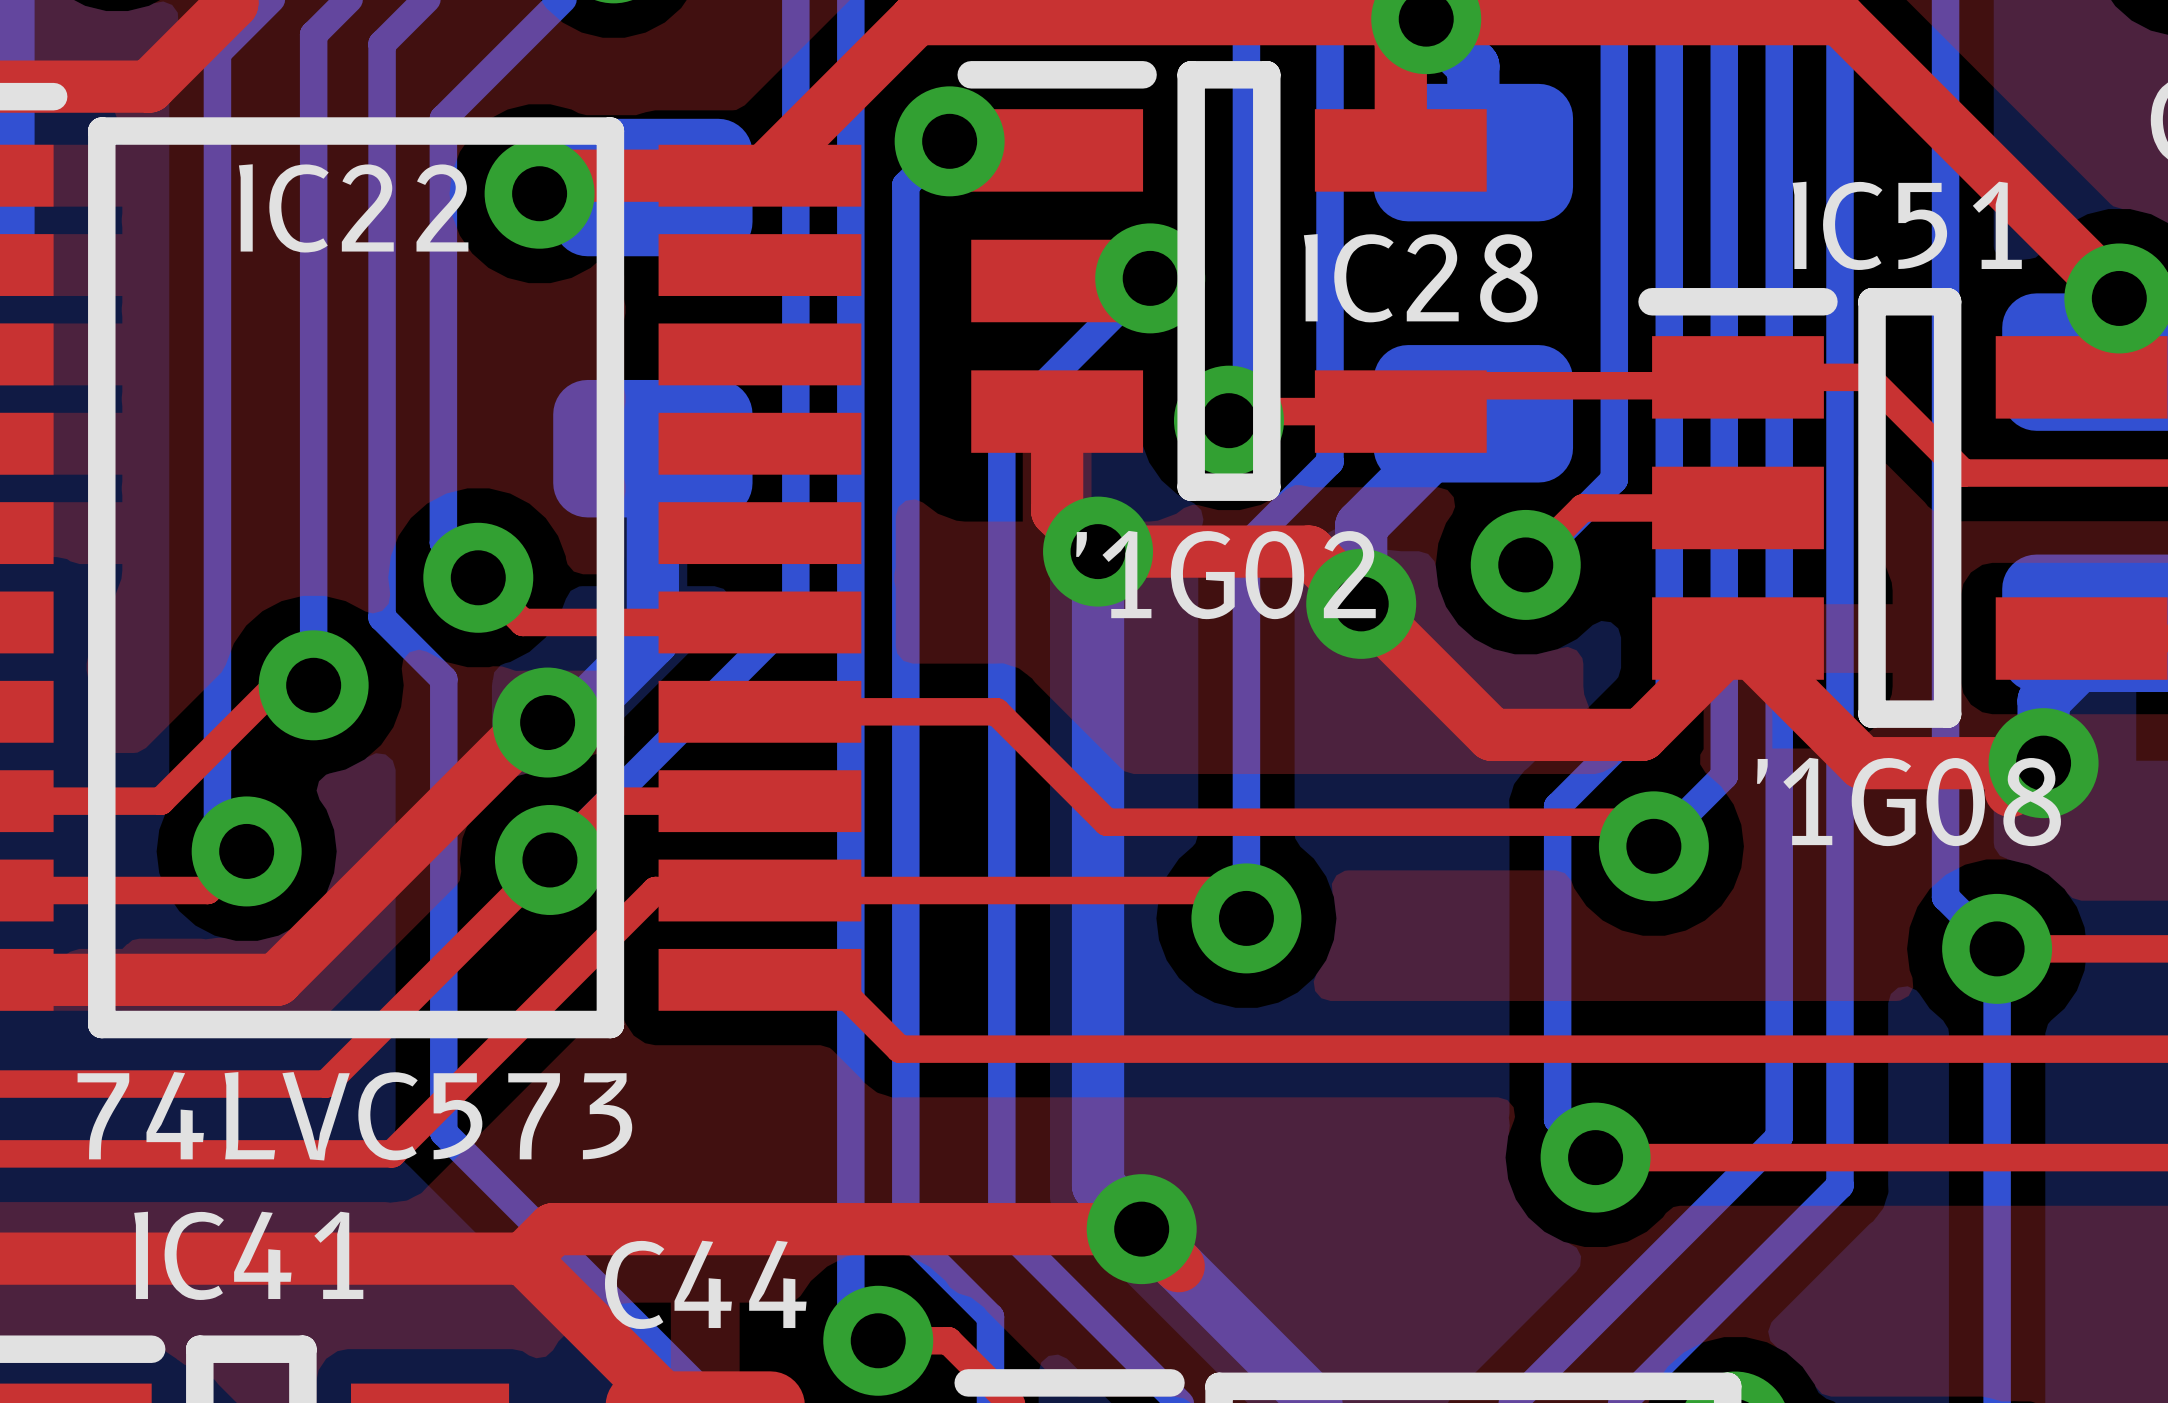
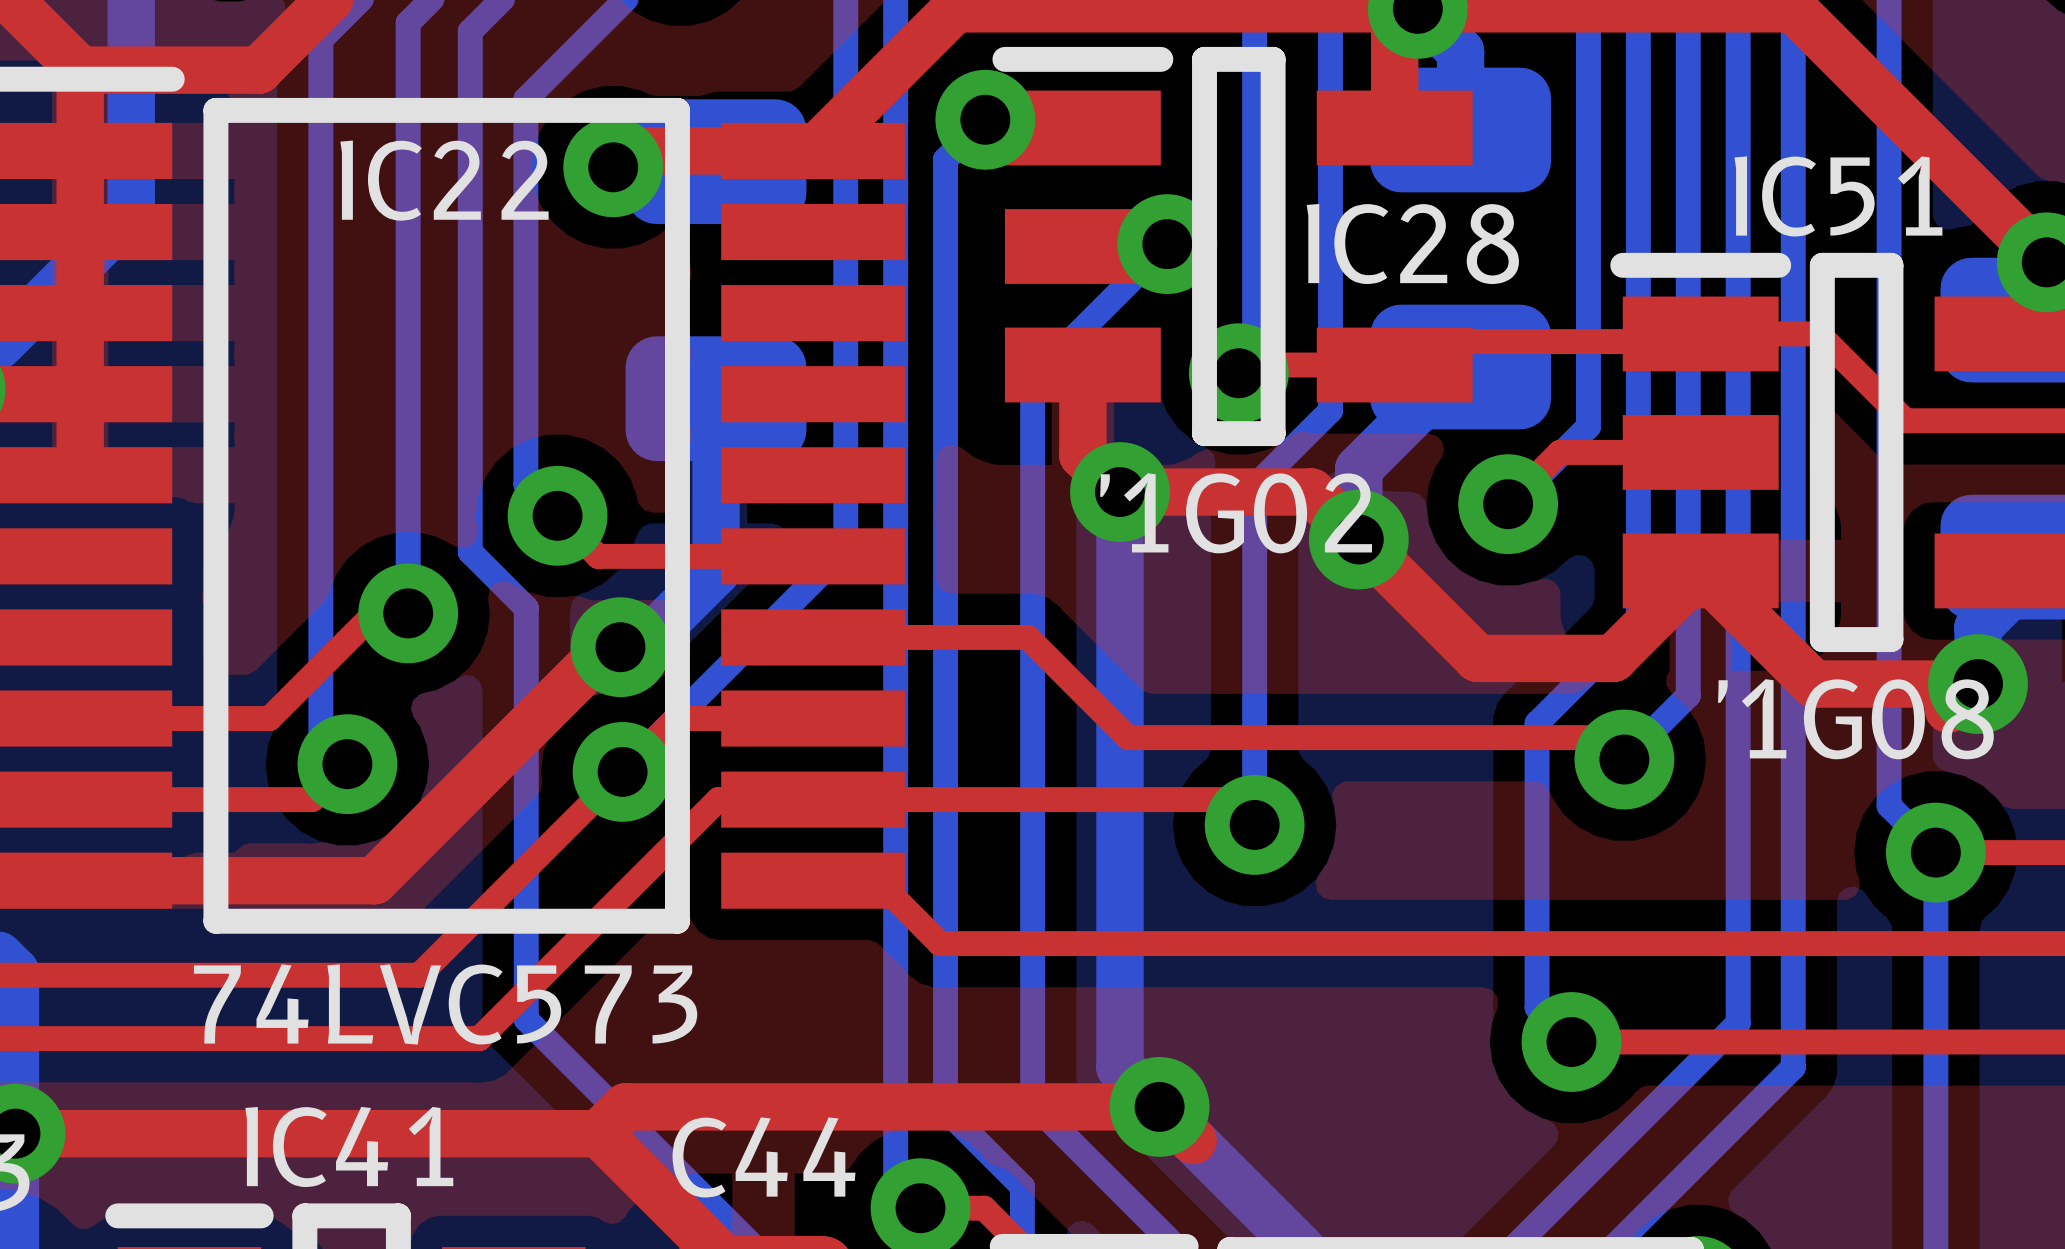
IC51 name position: IC51 (1907, 225) -> IC51 (1838, 196)
IC41 name position: IC41 (248, 1255) -> IC41 (349, 1146)

